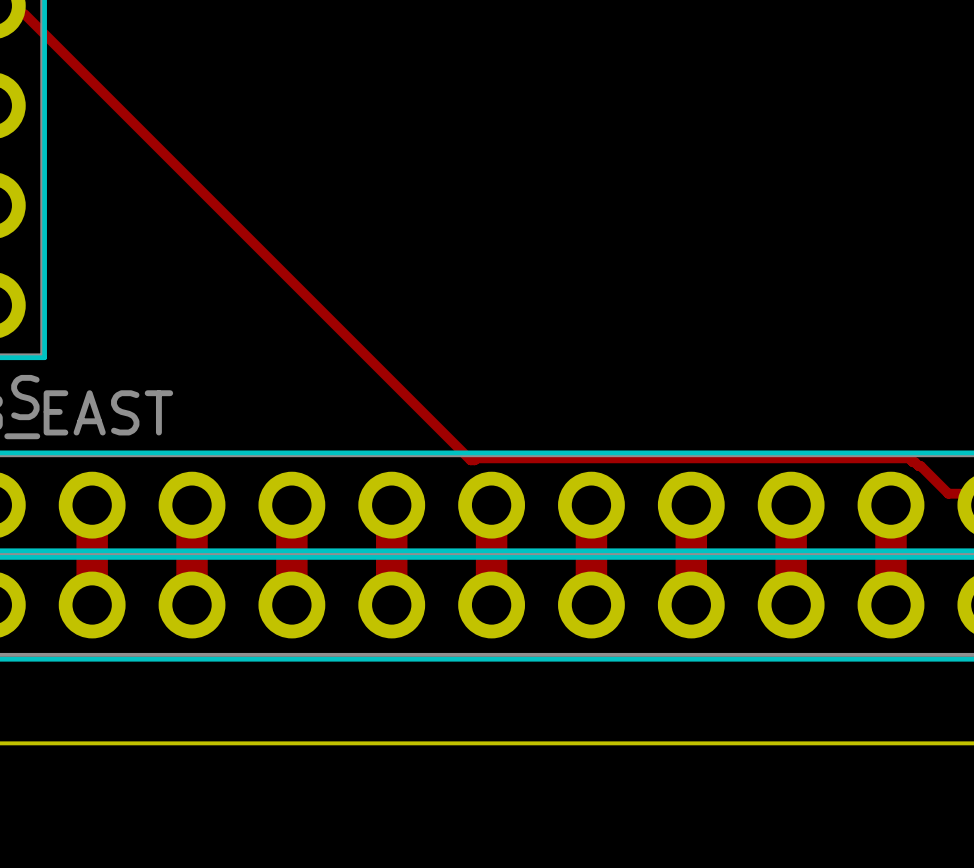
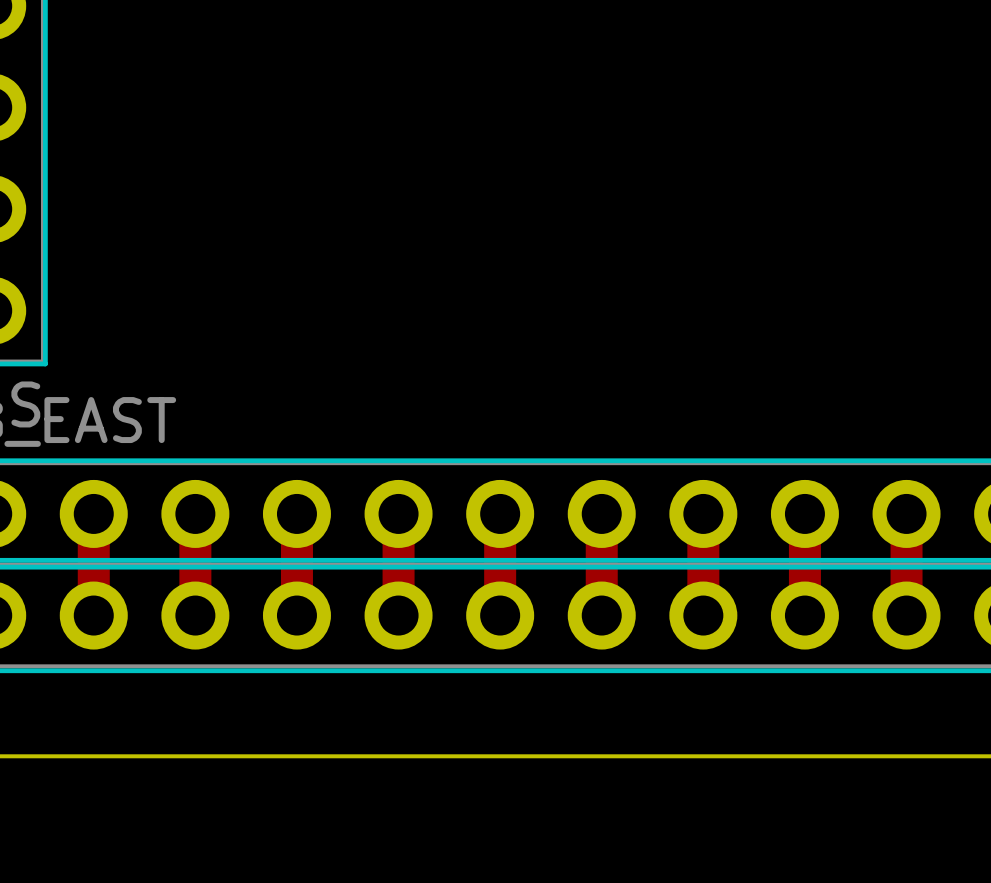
top track: (24, 14) (470, 460) (476, 458) (909, 458) (920, 466) (948, 493) (960, 493) -> none

